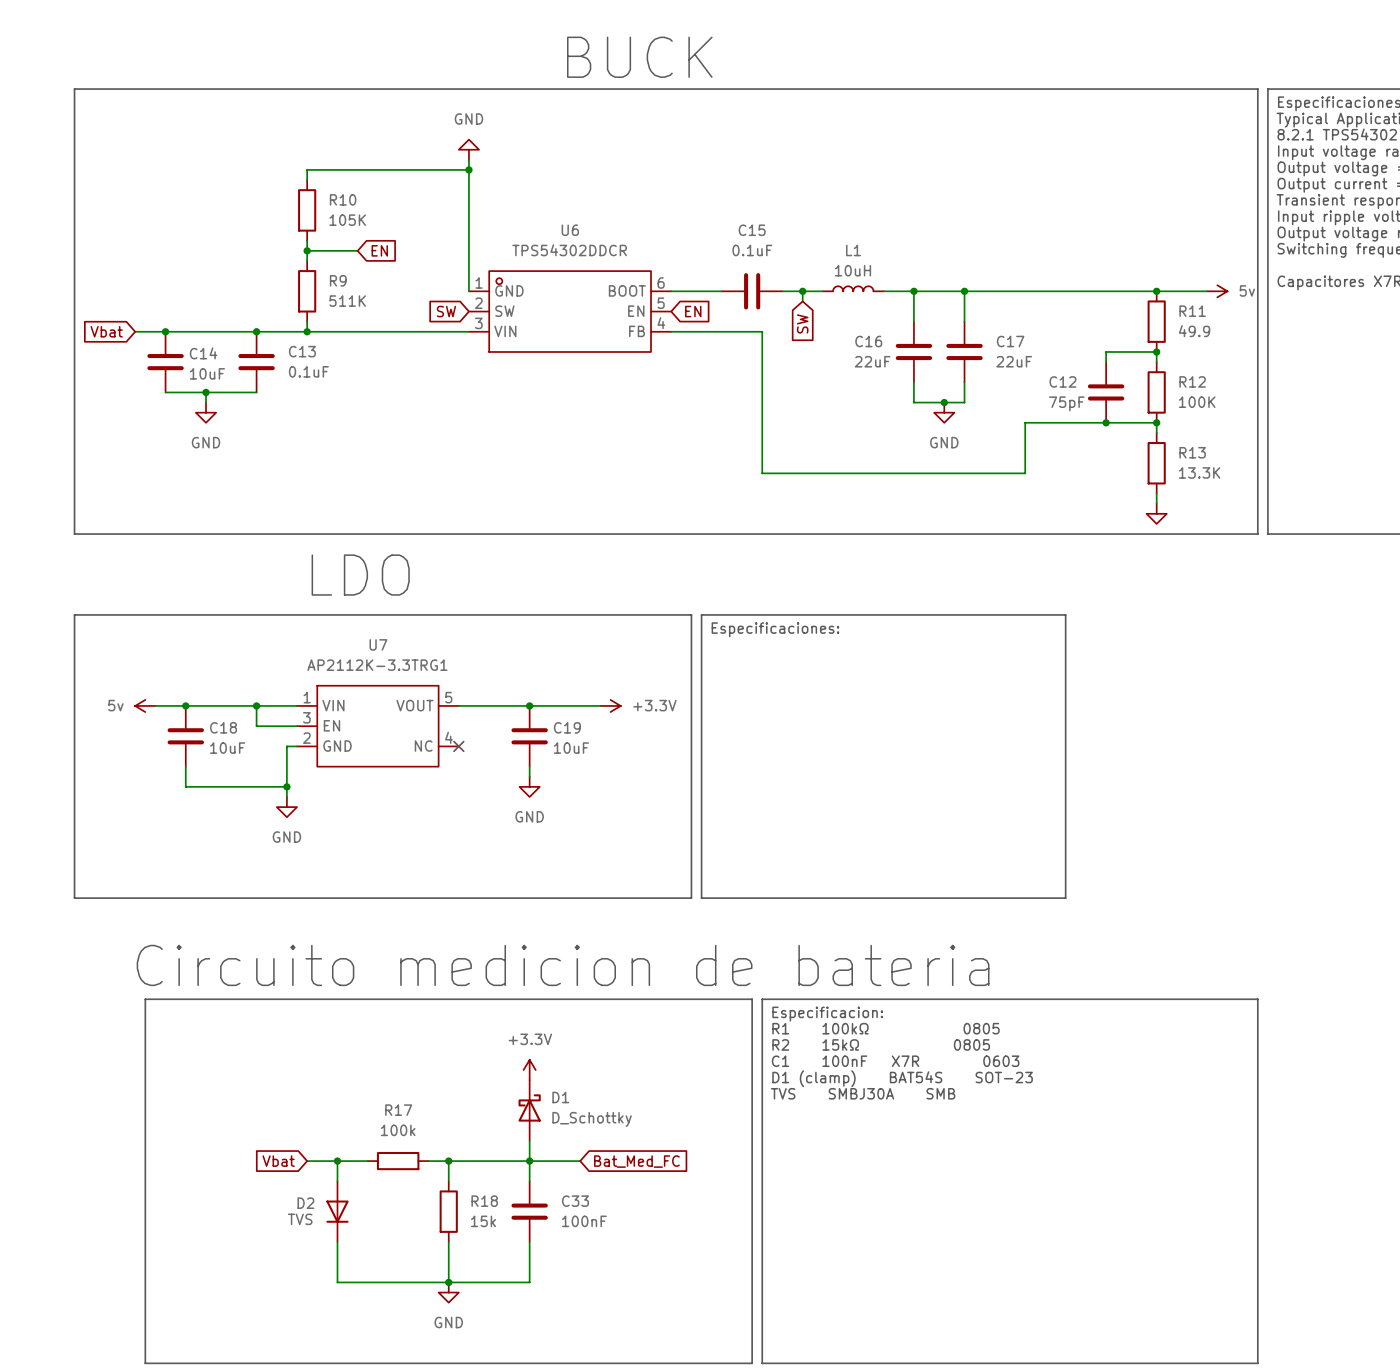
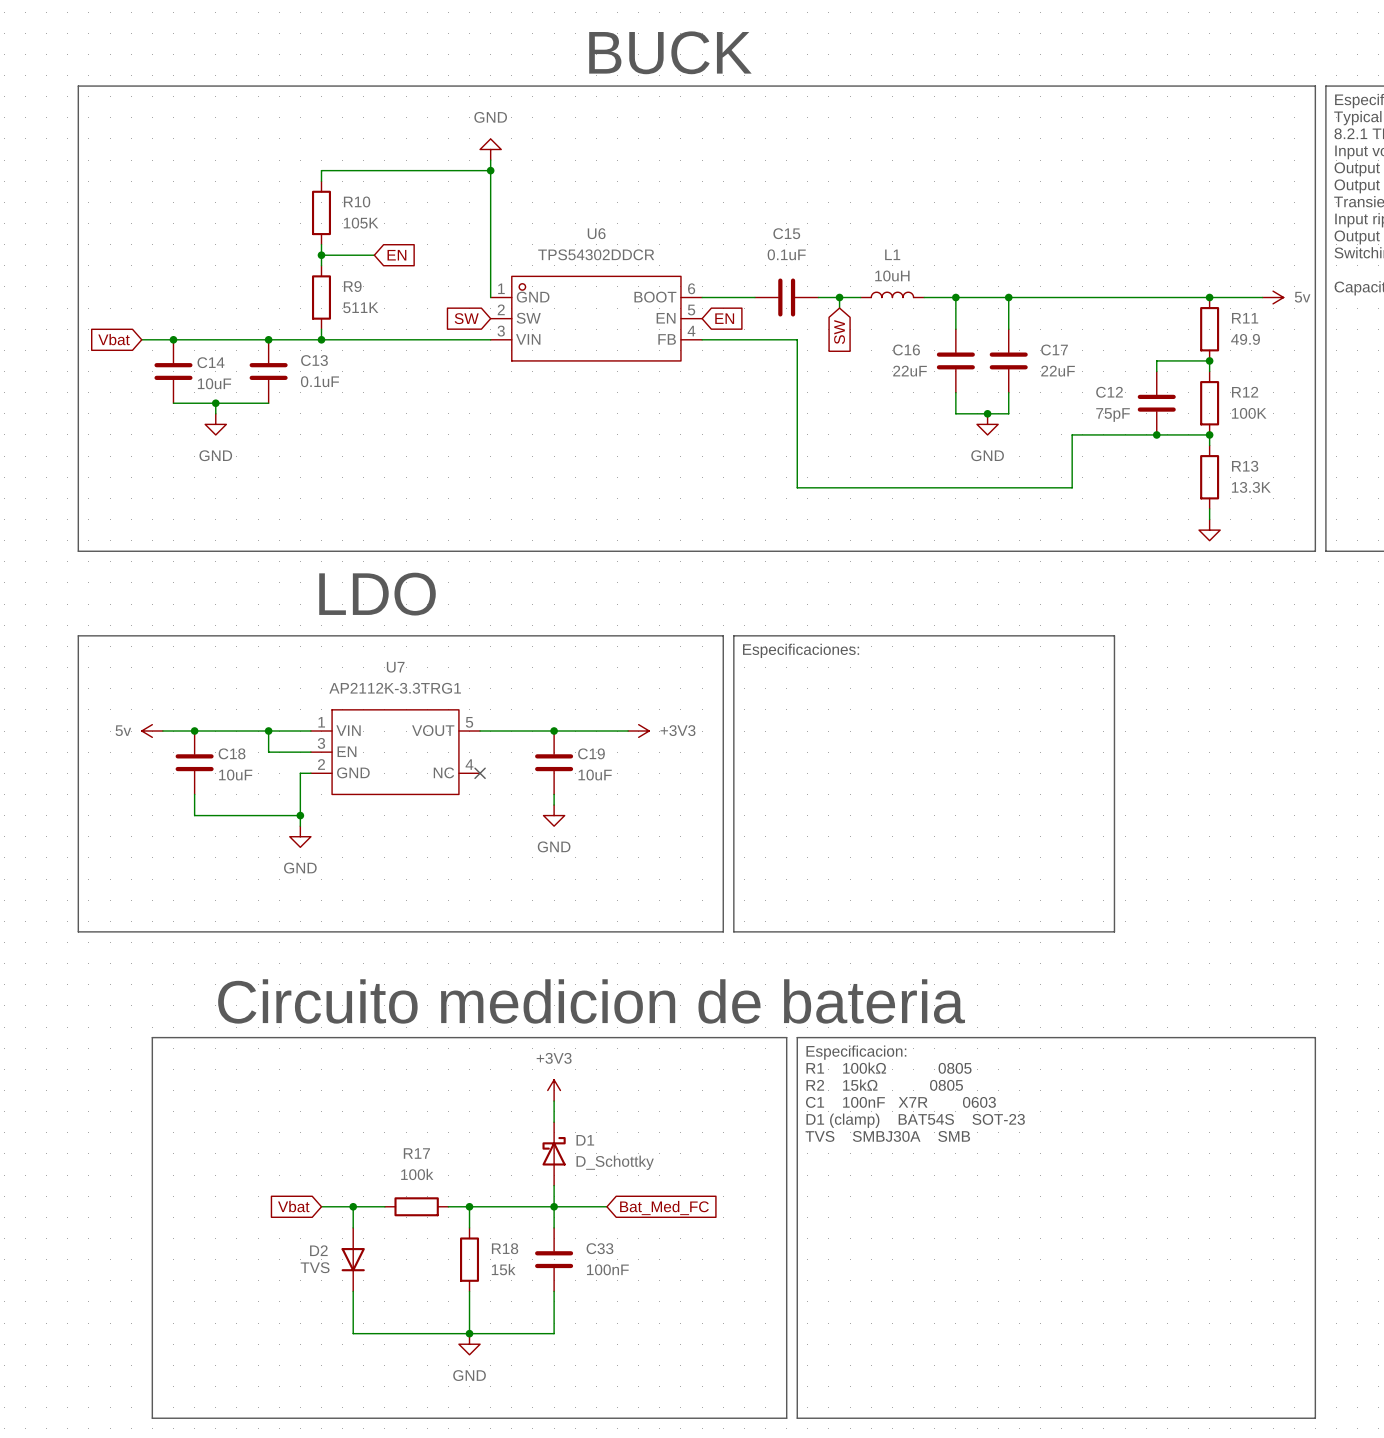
power symbol: +3.3V (610, 705) -> +3V3 (638, 731)
power symbol: none -> +3V3 (554, 1090)
power symbol: +3.3V (529, 1070) -> none

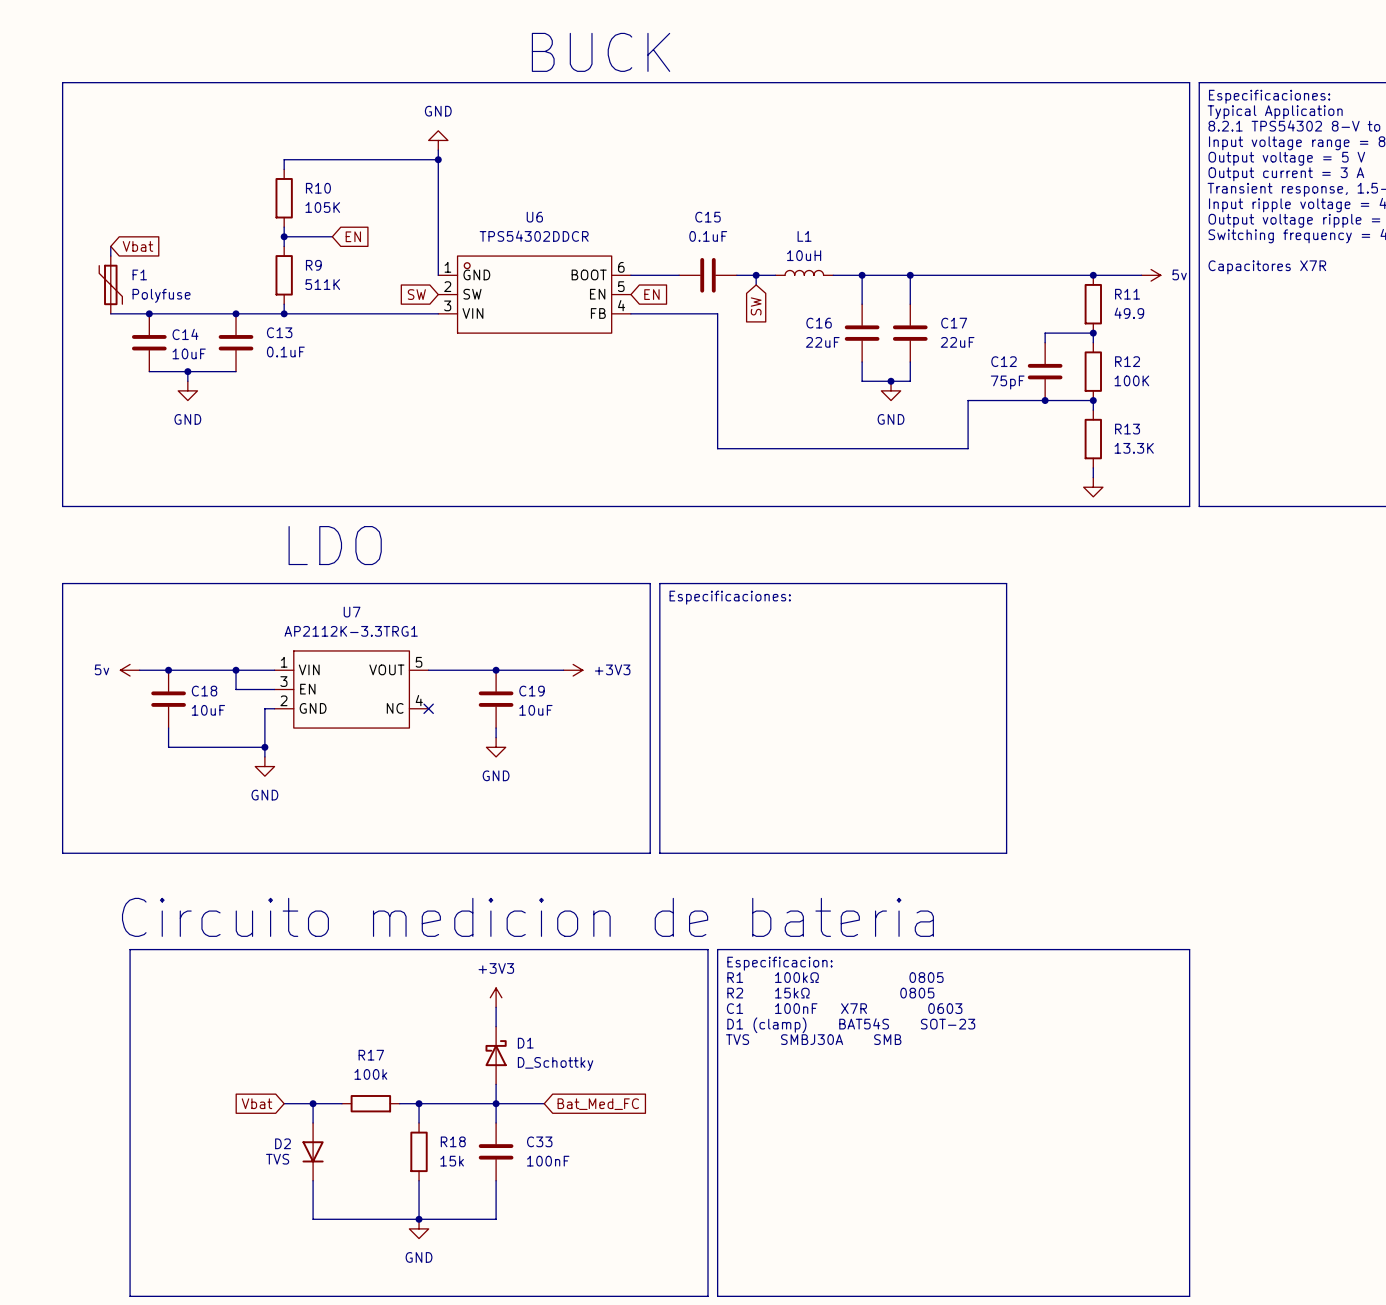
wire: none -> (110, 246) (110, 256)
F1: none -> Polyfuse (110, 284)
global label rotation: 0° (114, 339) -> 180° (137, 246)
global label position: Vbat (114, 339) -> Vbat (137, 246)
wire: none -> (110, 313) (120, 313)

